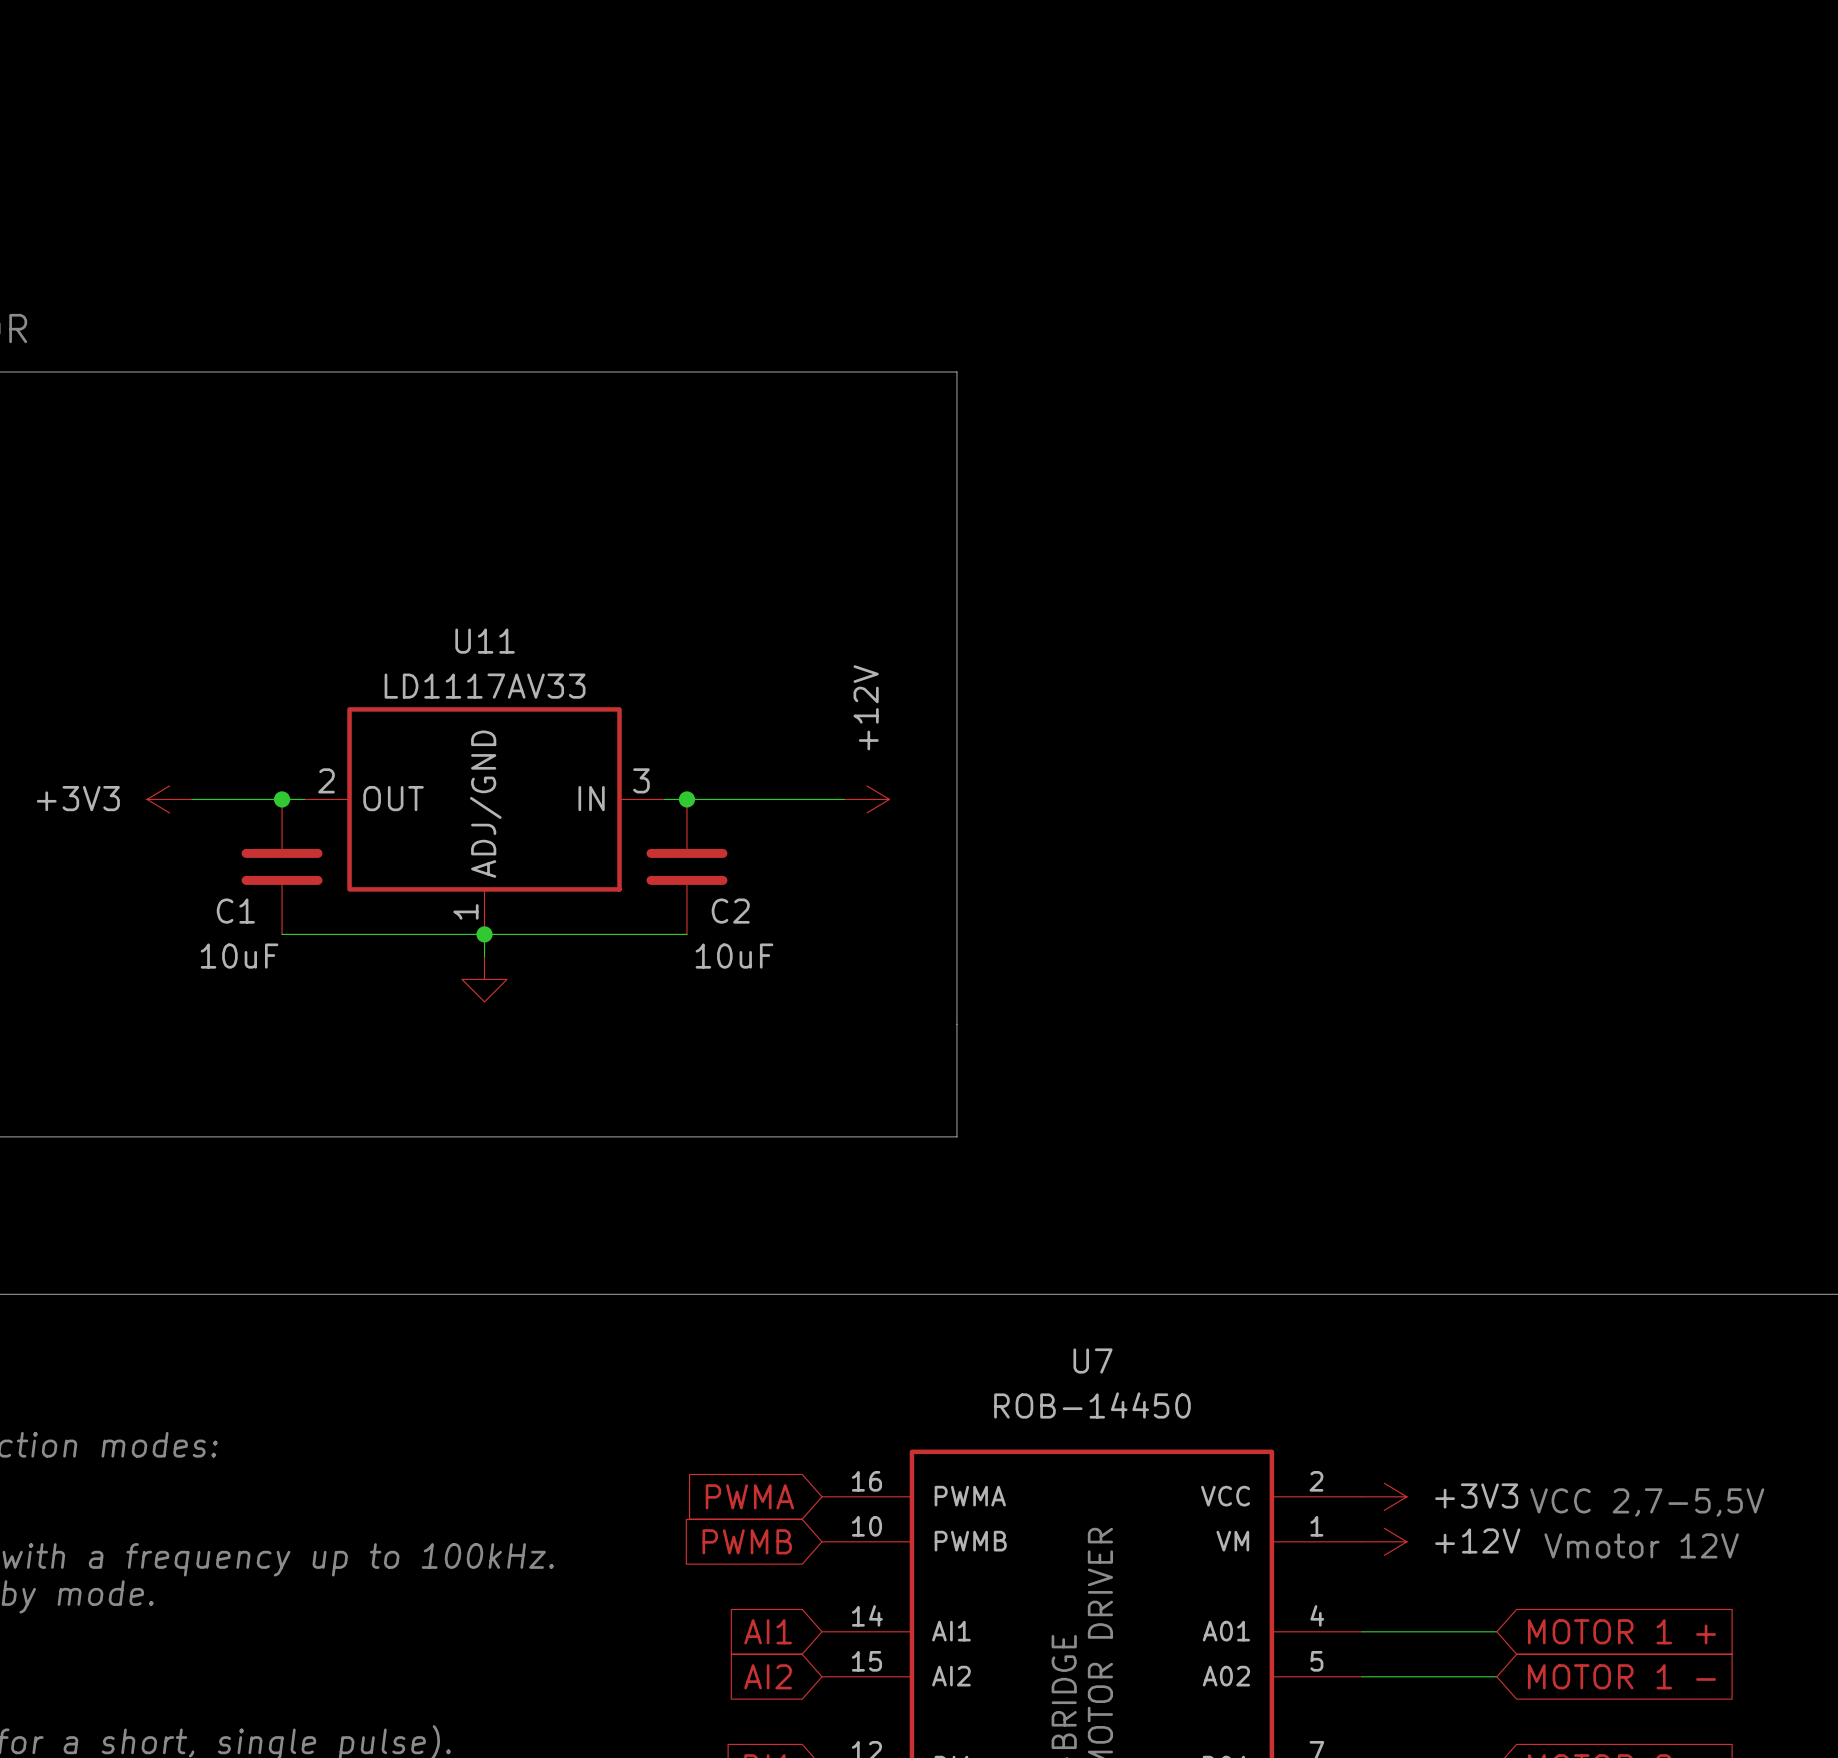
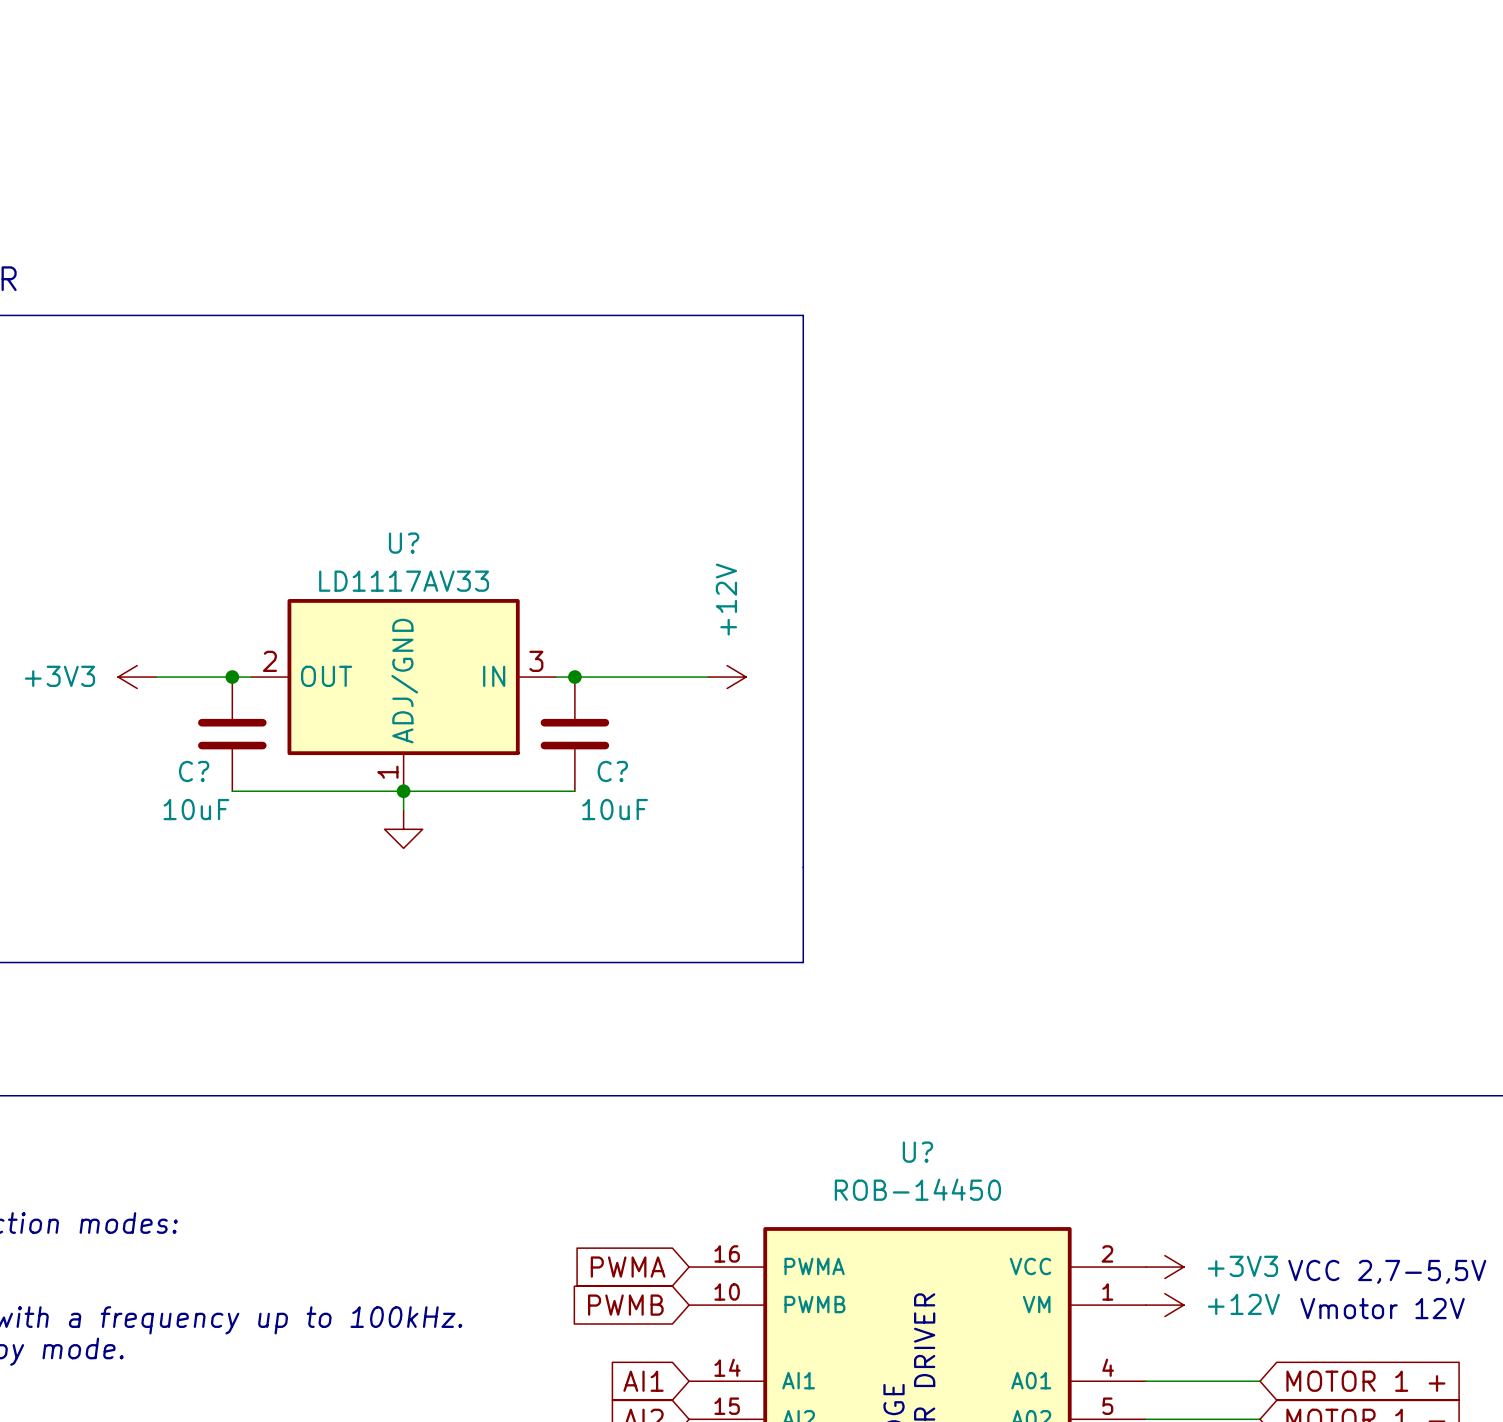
U11 name: U11 (485, 641) -> U? (404, 543)
C1 name: C1 (235, 911) -> C? (194, 771)
C2 name: C2 (730, 911) -> C? (612, 771)
U7 name: U7 (1092, 1361) -> U? (917, 1152)

